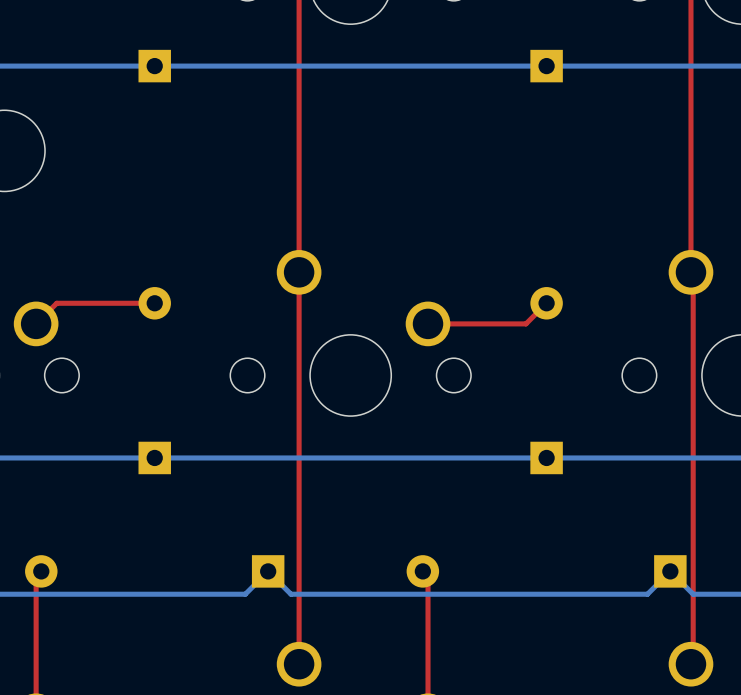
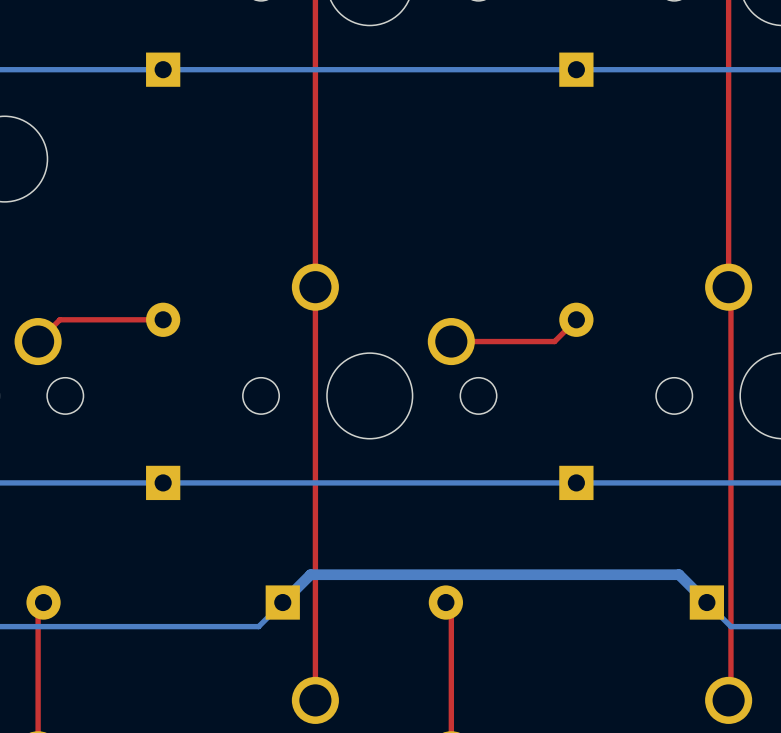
bottom track: (670, 571) (647, 594) (291, 594) (268, 571) -> (706, 602) (679, 574) (310, 574) (282, 602)

